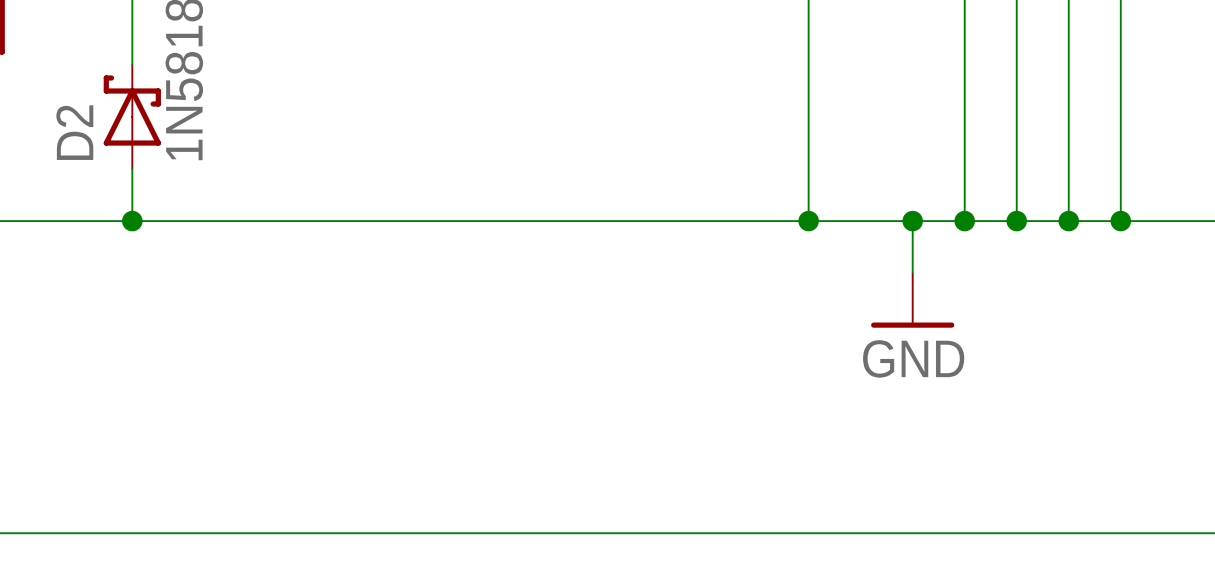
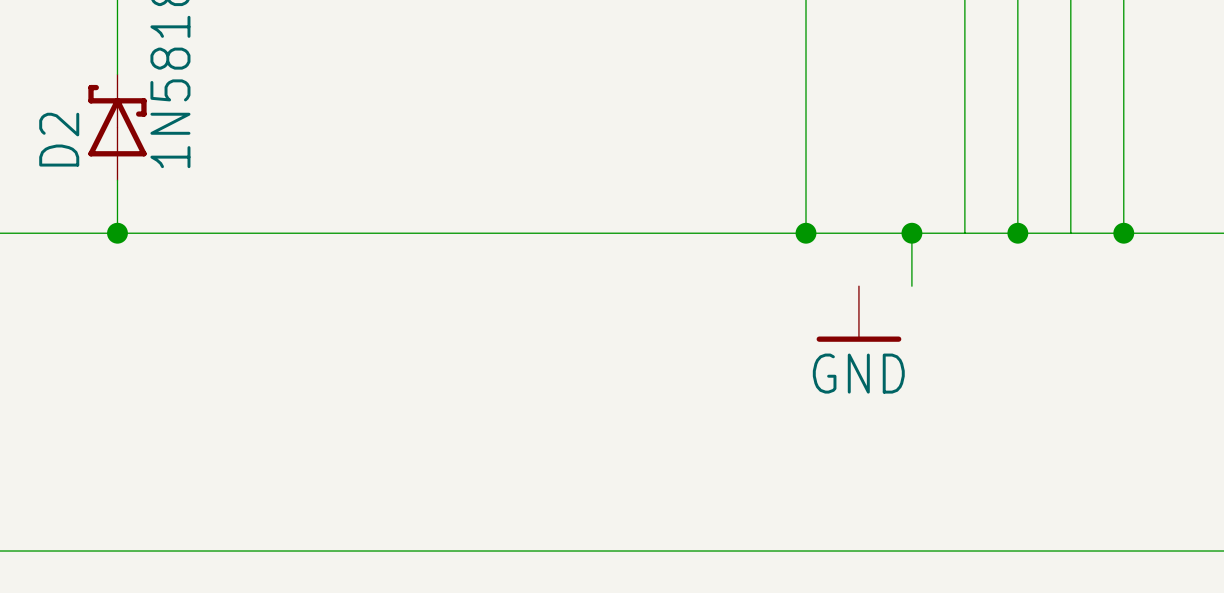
junction: (964, 221) -> none
junction: (1068, 221) -> none
power symbol position: GND (912, 300) -> GND (858, 313)

